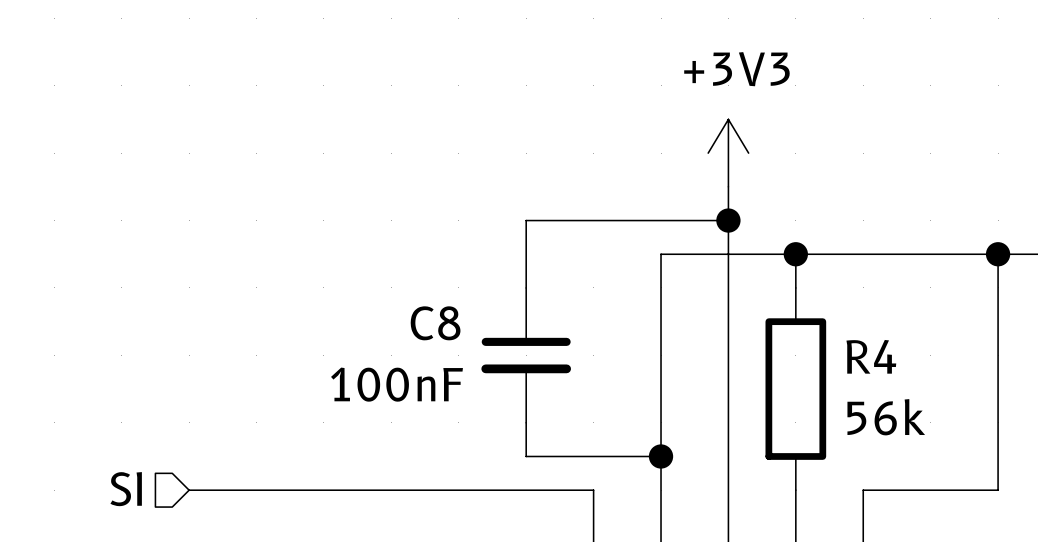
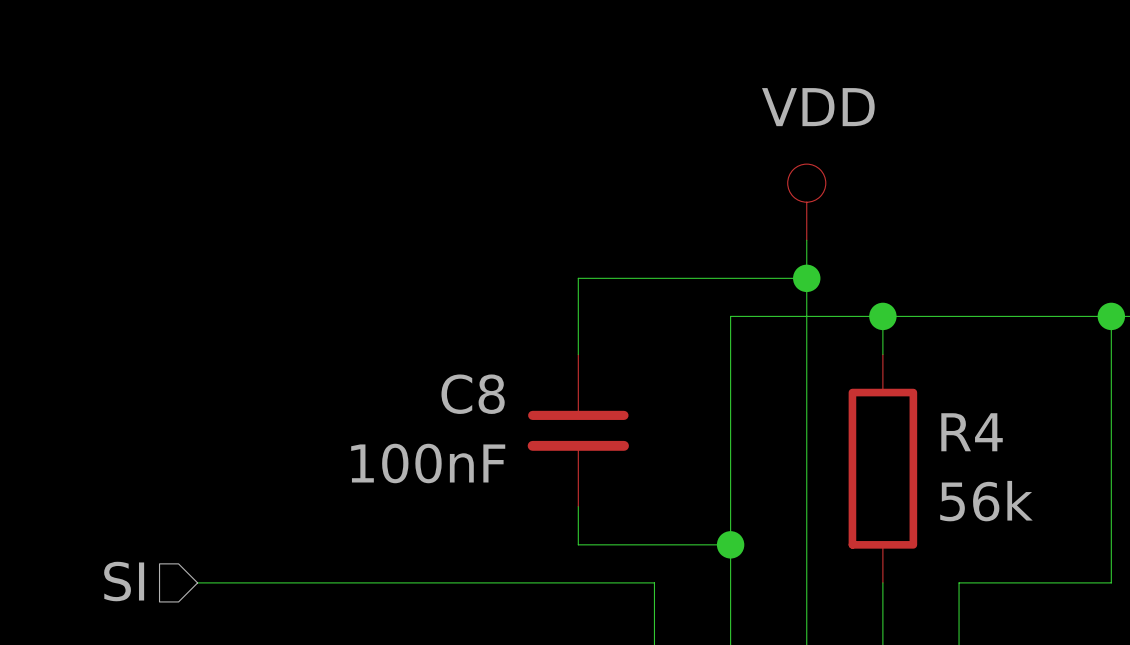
power symbol: +3V3 (728, 153) -> VDD (806, 202)

